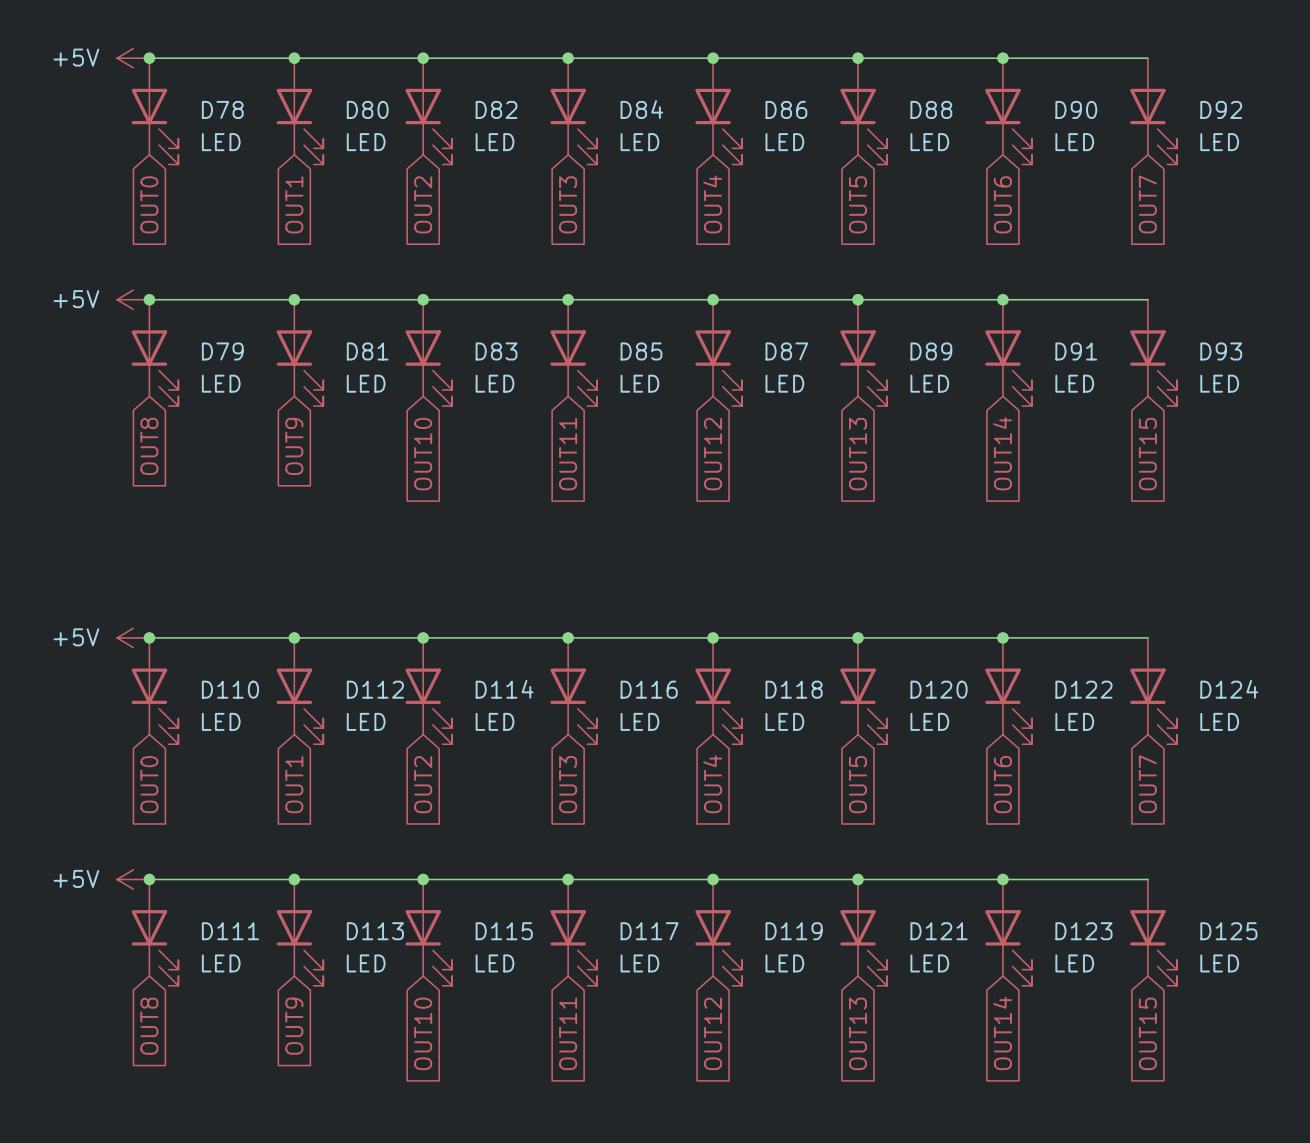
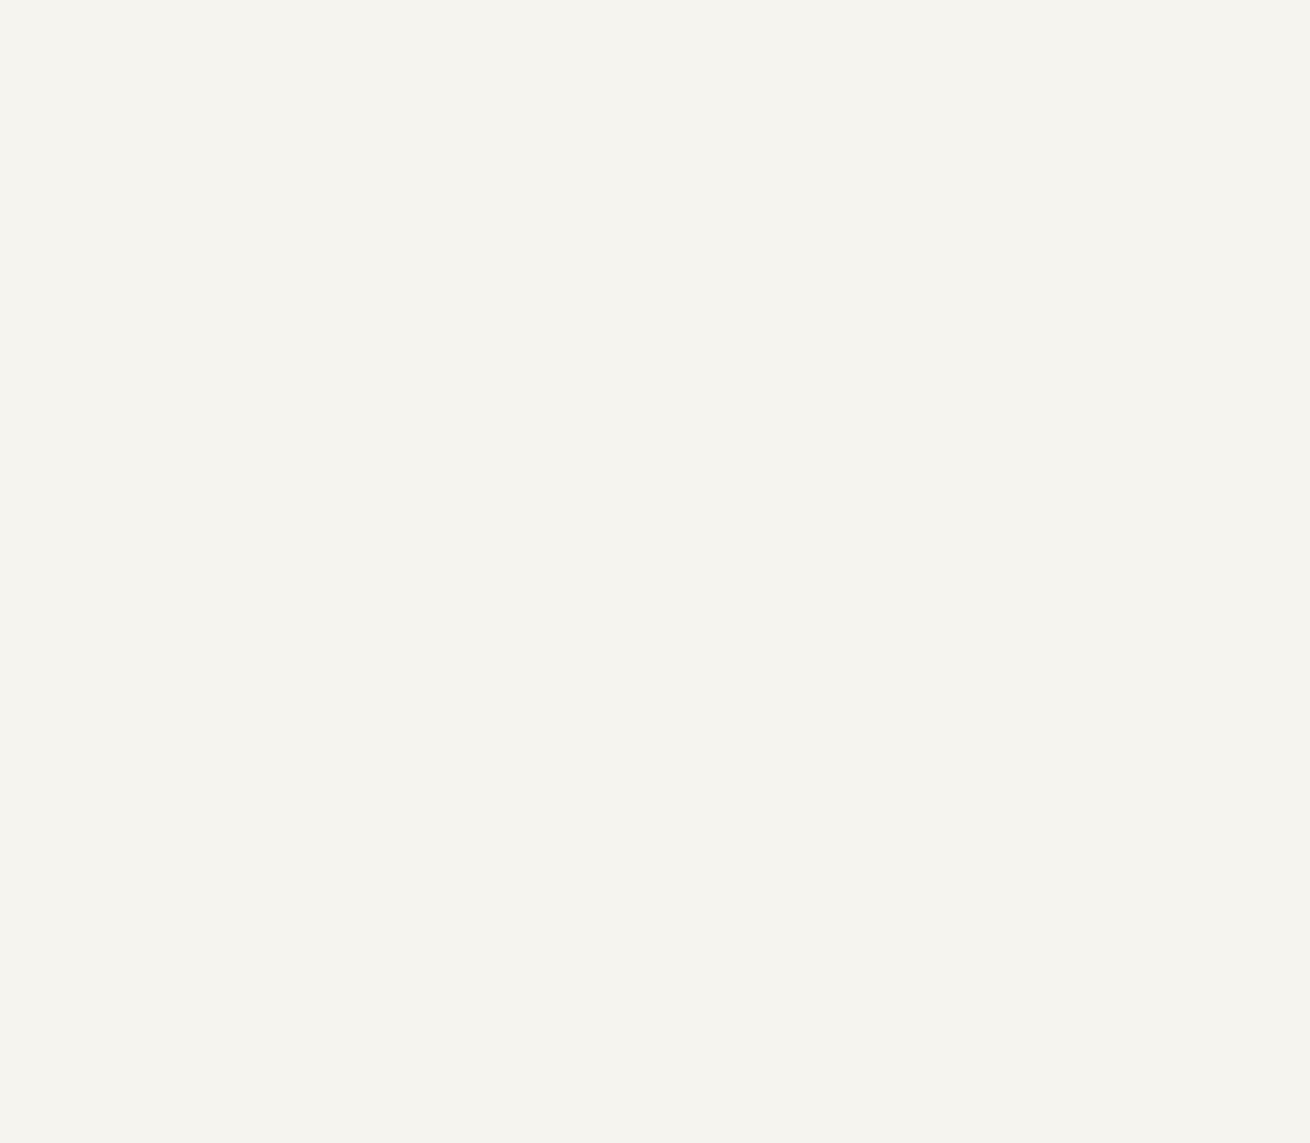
power symbol: +5V (133, 58) -> none
wire: (149, 58) (1147, 58) -> none
junction: (149, 58) -> none
junction: (294, 58) -> none
junction: (423, 58) -> none
junction: (568, 58) -> none
junction: (713, 58) -> none
junction: (858, 58) -> none
junction: (1002, 58) -> none
D78: LED (155, 111) -> none
D80: LED (299, 111) -> none
D82: LED (428, 111) -> none
D84: LED (573, 111) -> none
D86: LED (718, 111) -> none
D88: LED (863, 111) -> none
D90: LED (1008, 111) -> none
D92: LED (1153, 111) -> none
global label: OUT0 (149, 204) -> none
global label: OUT1 (294, 204) -> none
global label: OUT2 (423, 204) -> none
global label: OUT3 (568, 204) -> none
global label: OUT4 (712, 204) -> none
global label: OUT5 (858, 204) -> none
global label: OUT6 (1002, 204) -> none
global label: OUT7 (1147, 204) -> none
power symbol: +5V (133, 299) -> none
wire: (149, 299) (1147, 299) -> none
junction: (149, 299) -> none
junction: (294, 299) -> none
junction: (423, 299) -> none
junction: (568, 299) -> none
junction: (713, 299) -> none
junction: (858, 299) -> none
junction: (1002, 299) -> none
D79: LED (155, 352) -> none
D81: LED (299, 352) -> none
D83: LED (428, 352) -> none
D85: LED (573, 352) -> none
D87: LED (718, 352) -> none
D89: LED (863, 352) -> none
D91: LED (1008, 352) -> none
D93: LED (1153, 352) -> none
global label: OUT8 (149, 446) -> none
global label: OUT9 (294, 446) -> none
global label: OUT14 (1002, 453) -> none
global label: OUT10 (423, 454) -> none
global label: OUT11 (568, 454) -> none
global label: OUT12 (713, 454) -> none
global label: OUT13 (858, 454) -> none
global label: OUT15 (1147, 454) -> none
power symbol: +5V (133, 637) -> none
wire: (149, 637) (1147, 637) -> none
junction: (149, 637) -> none
junction: (294, 637) -> none
junction: (423, 637) -> none
junction: (568, 637) -> none
junction: (713, 637) -> none
junction: (858, 637) -> none
junction: (1002, 637) -> none
D110: LED (155, 691) -> none
D112: LED (299, 691) -> none
D114: LED (428, 691) -> none
D116: LED (573, 691) -> none
D118: LED (718, 691) -> none
D120: LED (863, 691) -> none
D122: LED (1008, 691) -> none
D124: LED (1153, 691) -> none
global label: OUT0 (149, 784) -> none
global label: OUT1 (294, 784) -> none
global label: OUT2 (423, 784) -> none
global label: OUT3 (568, 784) -> none
global label: OUT4 (712, 784) -> none
global label: OUT5 (858, 784) -> none
global label: OUT6 (1002, 784) -> none
global label: OUT7 (1147, 784) -> none
power symbol: +5V (133, 879) -> none
wire: (149, 879) (1147, 879) -> none
junction: (149, 879) -> none
junction: (294, 879) -> none
junction: (423, 879) -> none
junction: (568, 879) -> none
junction: (713, 879) -> none
junction: (858, 879) -> none
junction: (1002, 879) -> none
D111: LED (155, 932) -> none
D113: LED (299, 932) -> none
D115: LED (428, 932) -> none
D117: LED (573, 932) -> none
D119: LED (718, 932) -> none
D121: LED (863, 932) -> none
D123: LED (1008, 932) -> none
D125: LED (1153, 932) -> none
global label: OUT8 (149, 1026) -> none
global label: OUT9 (294, 1026) -> none
global label: OUT10 (423, 1033) -> none
global label: OUT11 (568, 1033) -> none
global label: OUT12 (713, 1033) -> none
global label: OUT13 (858, 1033) -> none
global label: OUT14 (1002, 1033) -> none
global label: OUT15 (1147, 1033) -> none

